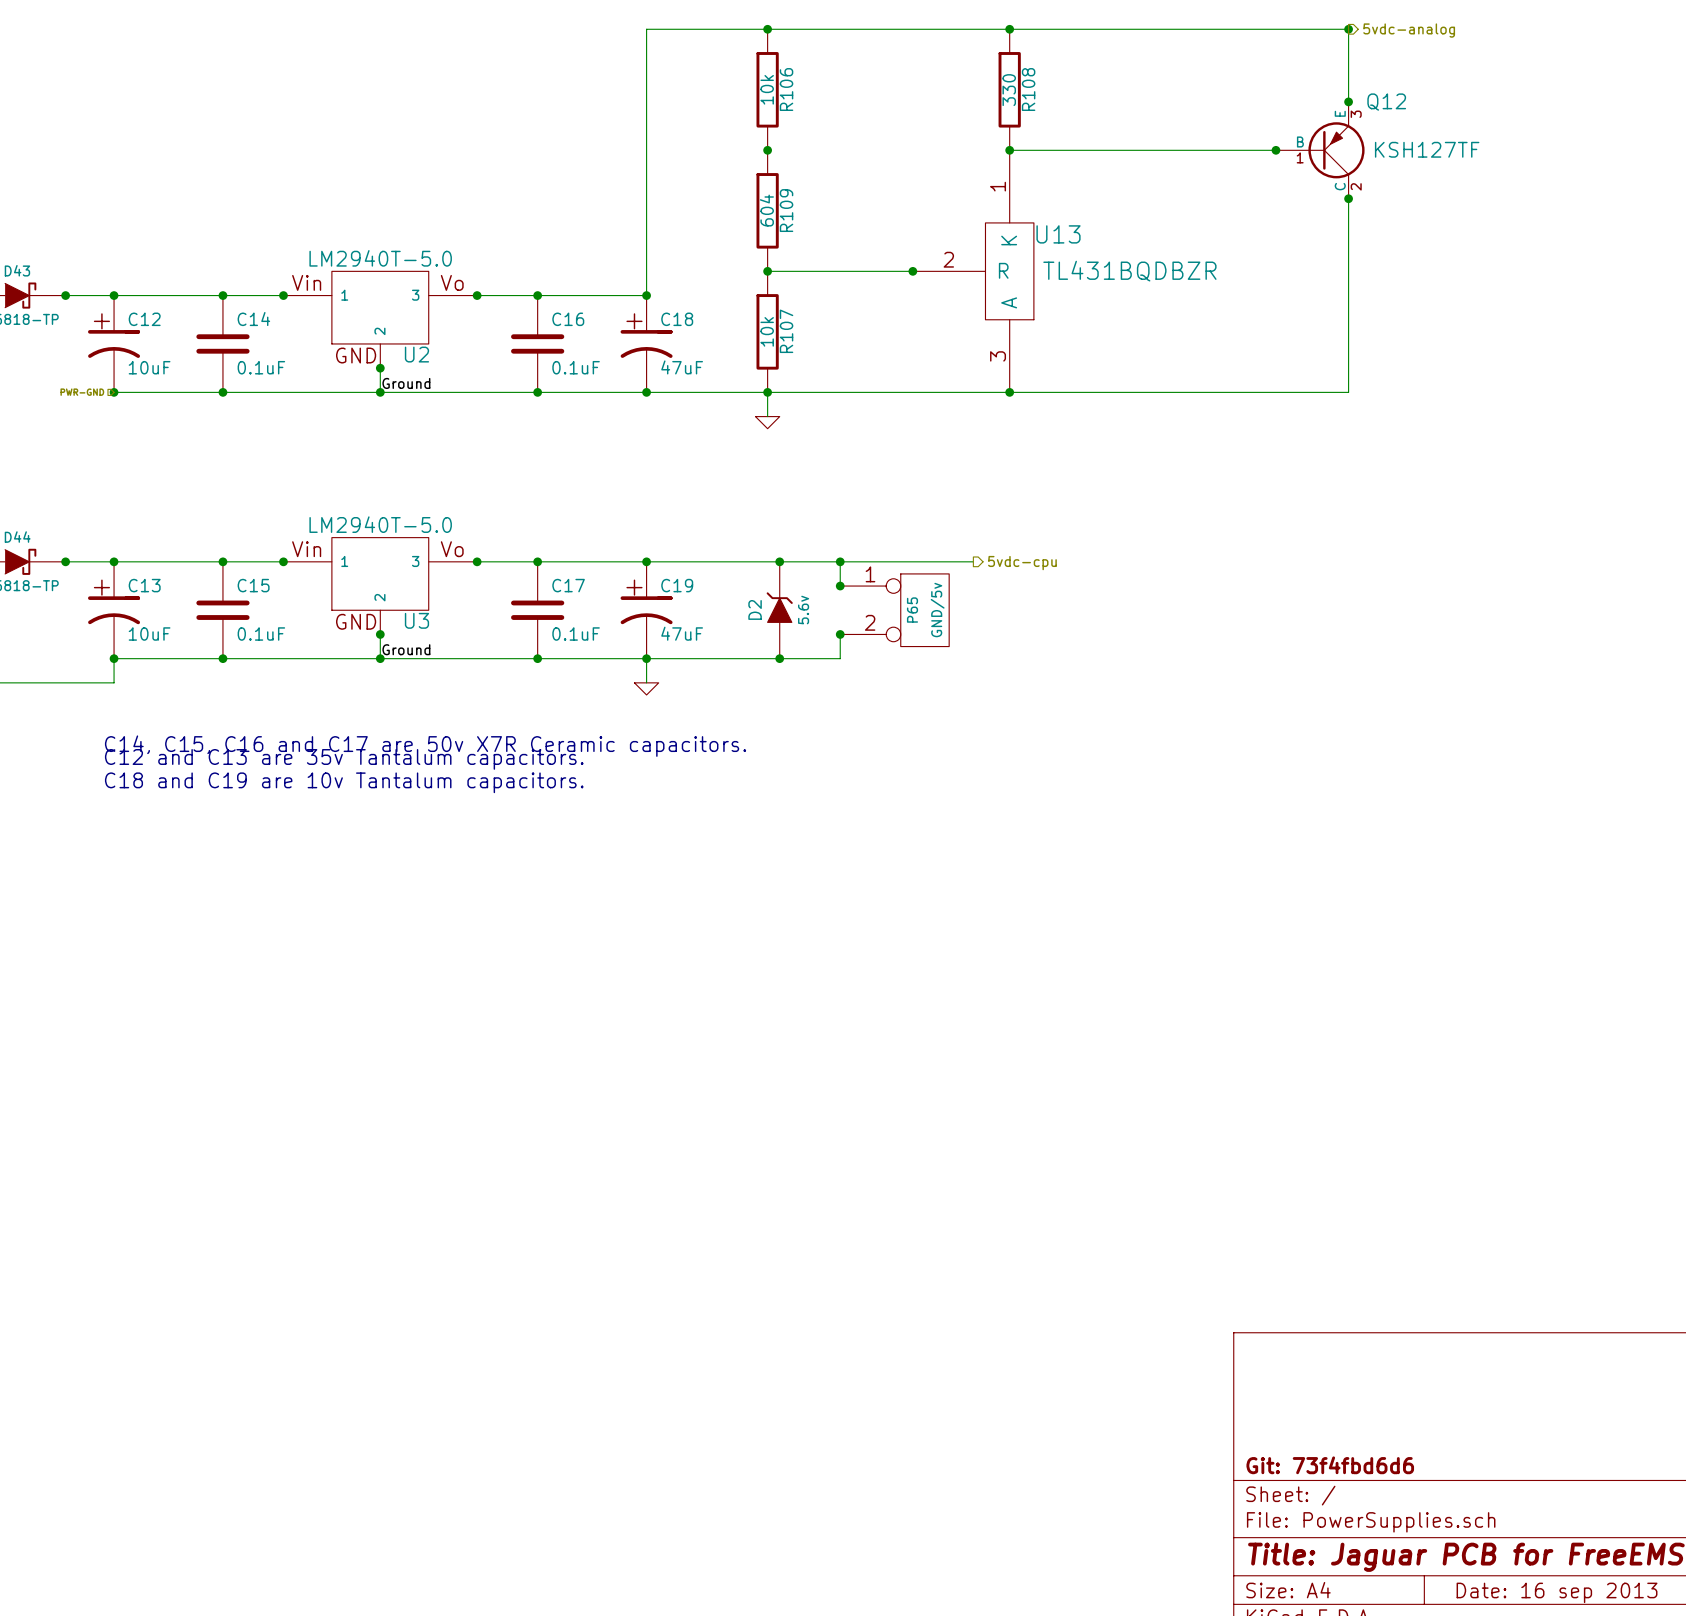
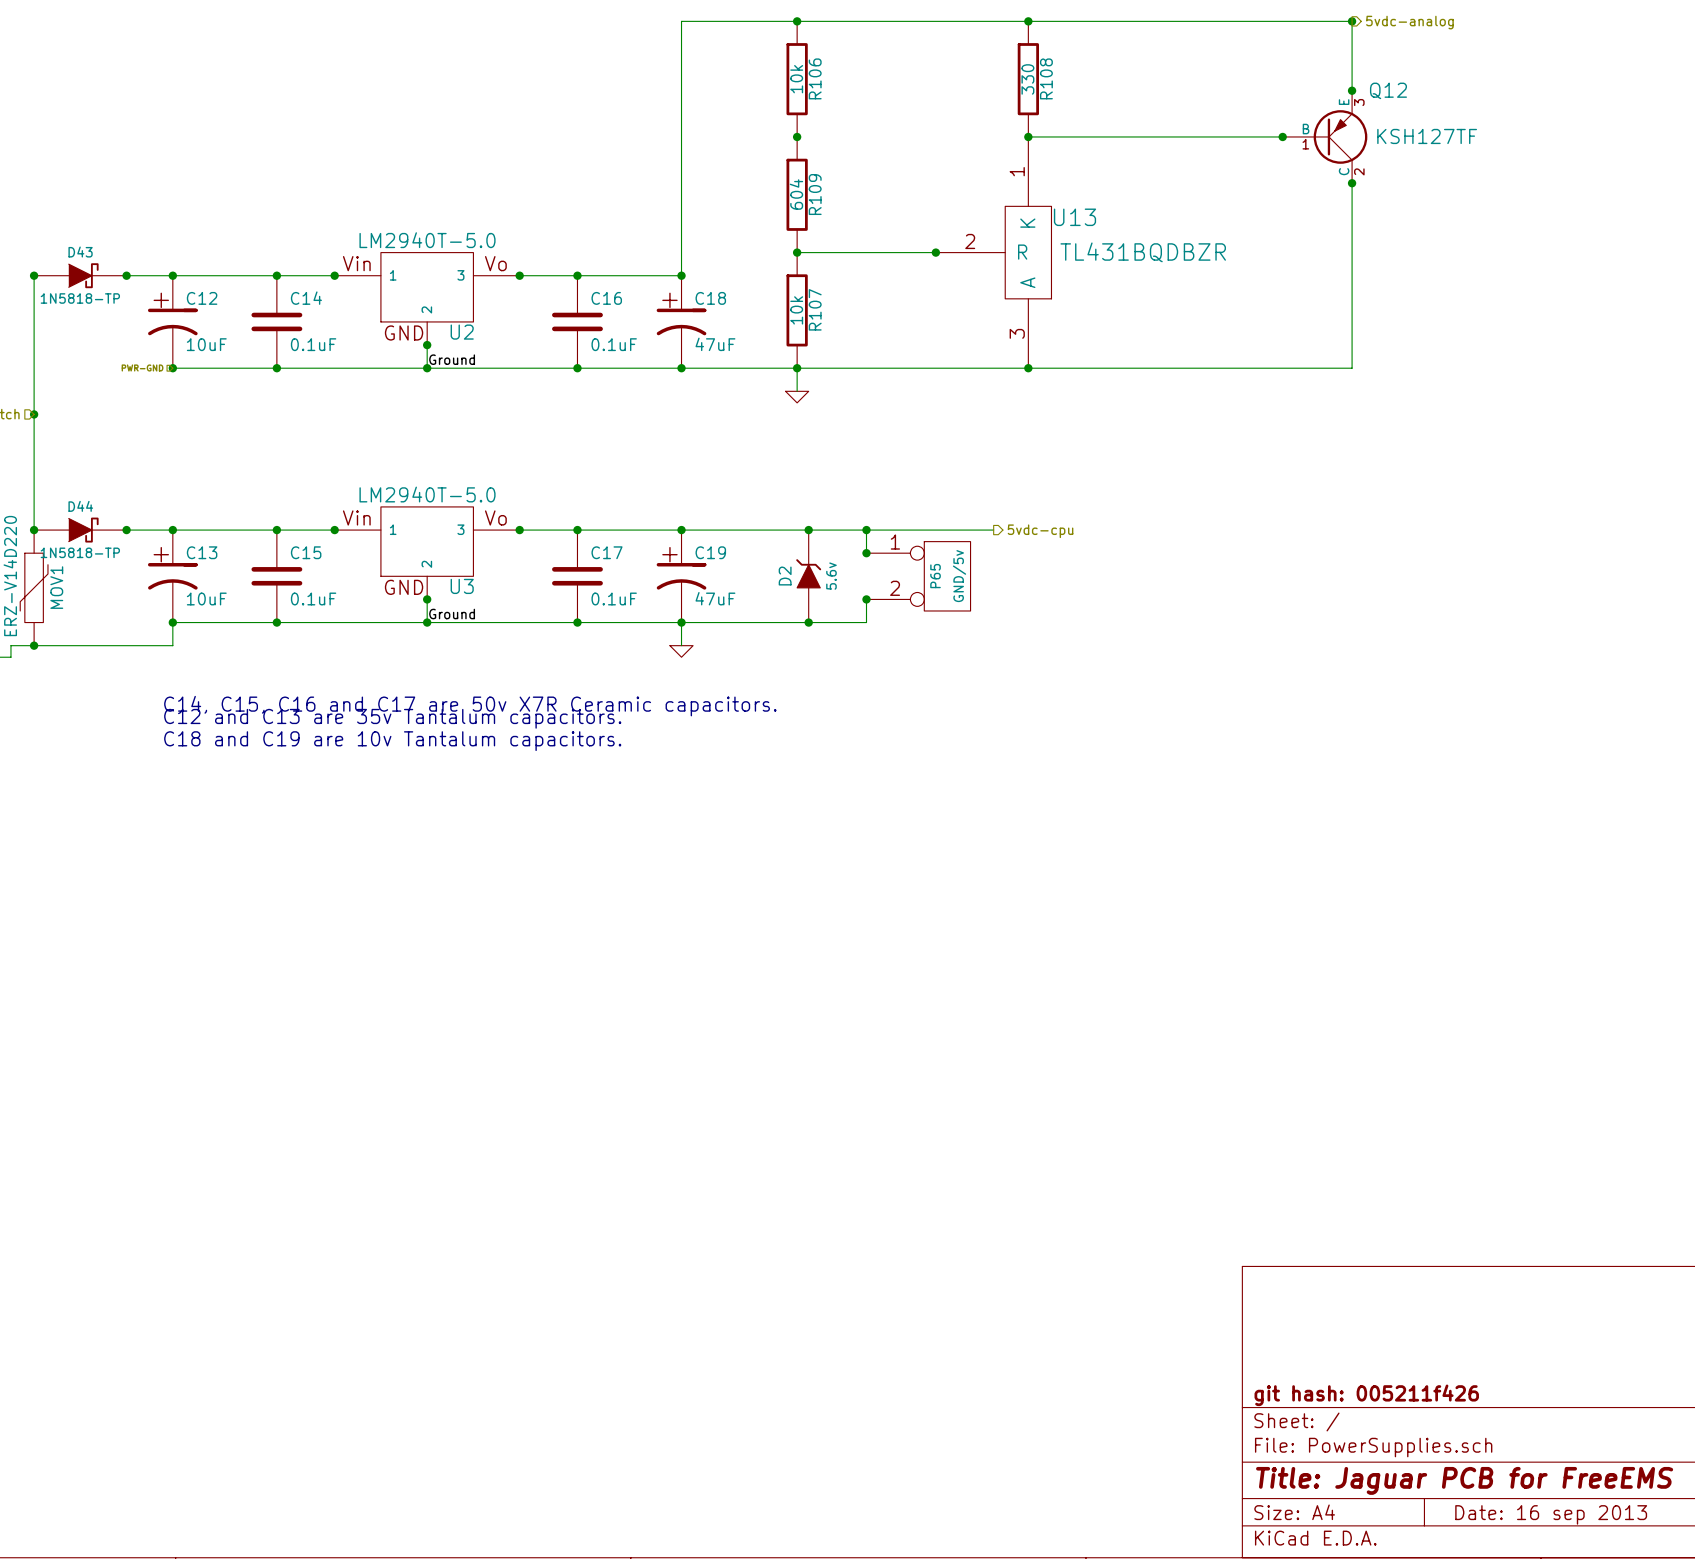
title block: Git: 73f4fbd6d6 (1330, 1465) -> git hash: 005211f426 (1366, 1395)

